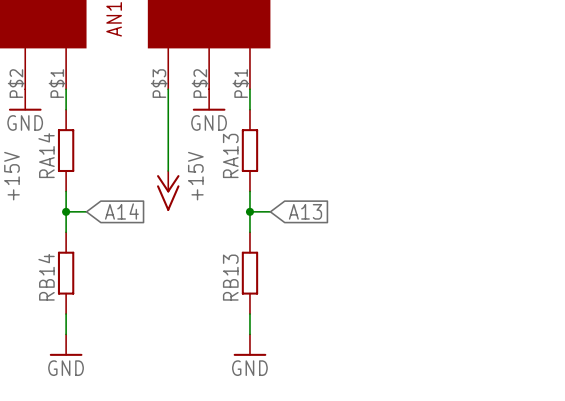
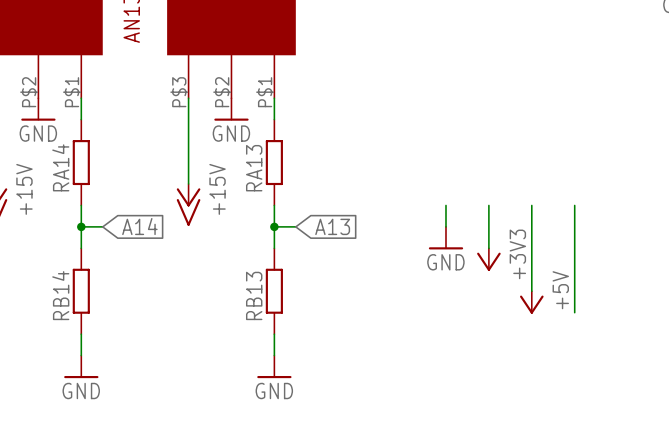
wire: none -> (445, 205) (445, 226)
wire: none -> (488, 205) (488, 248)
wire: none -> (531, 205) (531, 291)
wire: none -> (574, 205) (574, 312)
power symbol: none -> GND (445, 238)
power symbol: none -> +3V3 (488, 259)
power symbol: none -> +5V (531, 302)

